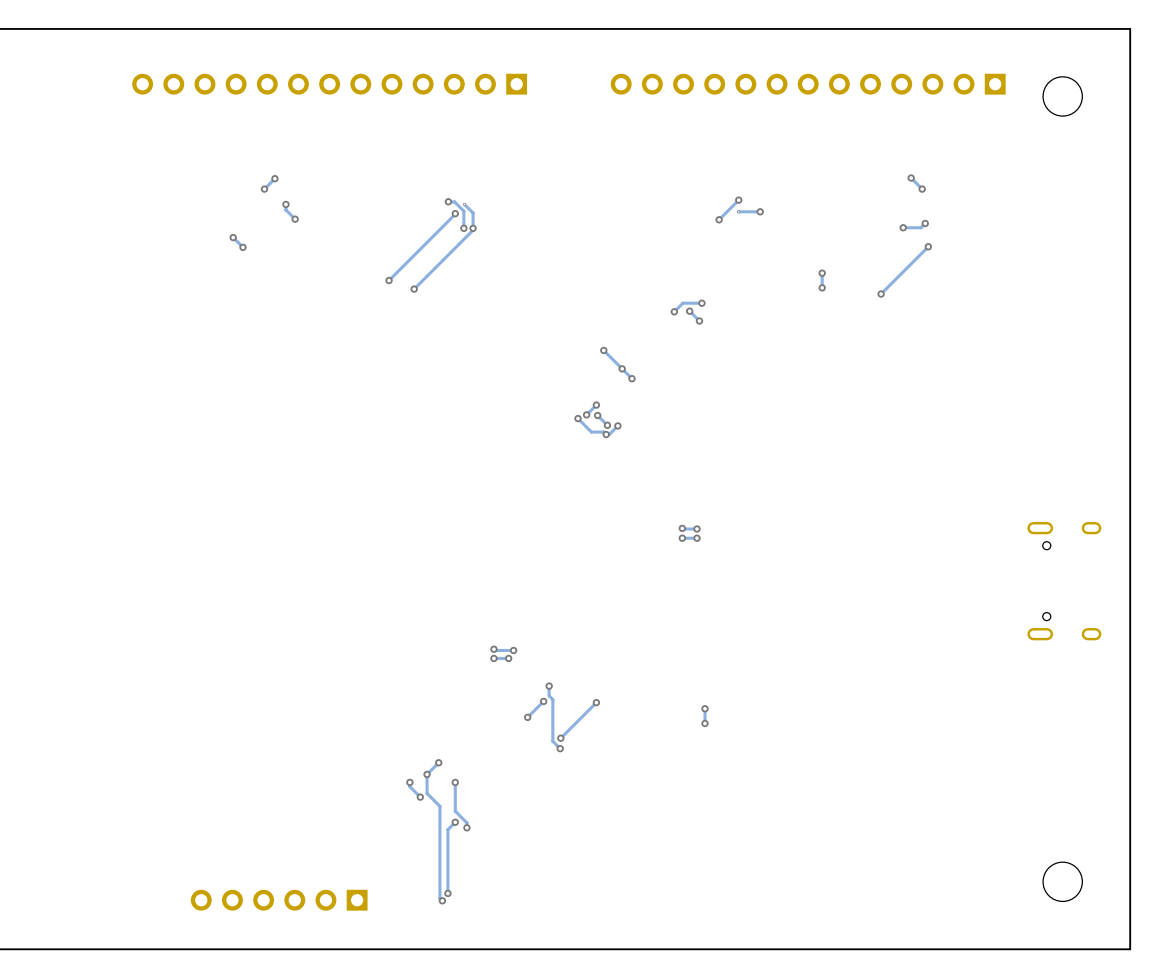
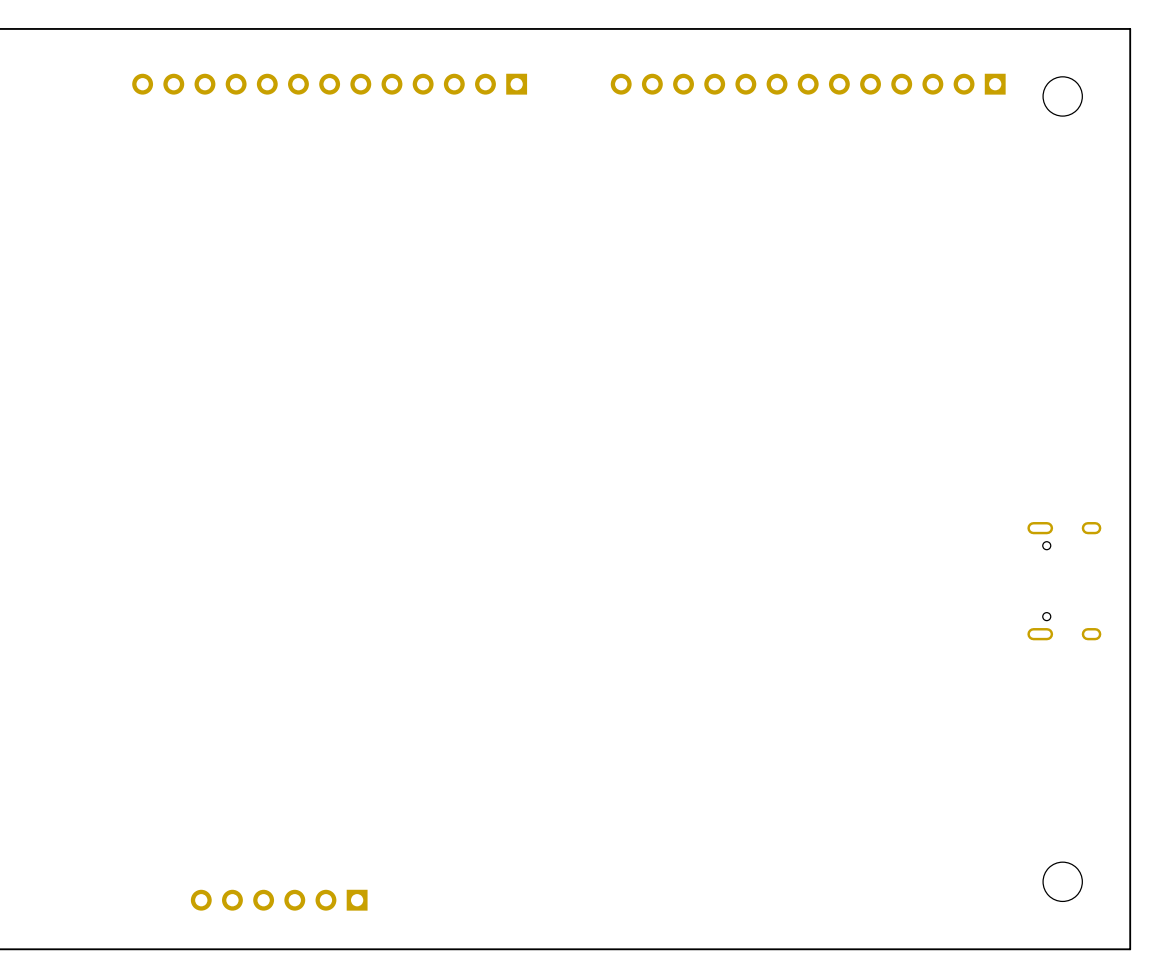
track: (274, 178) (264, 189) -> none
via: (274, 178) -> none
track: (911, 178) (922, 189) -> none
via: (911, 178) -> none
via: (264, 189) -> none
via: (922, 189) -> none
track: (738, 200) (719, 219) -> none
via: (738, 200) -> none
track: (448, 201) (454, 201) (463, 211) (463, 228) -> none
via: (448, 201) -> none
track: (285, 204) (285, 209) (295, 219) -> none
via: (285, 204) -> none
track: (464, 204) (473, 213) (473, 230) (414, 289) -> none
via: (464, 204) -> none
via: (738, 211) -> none
track: (760, 211) (738, 211) -> none
via: (760, 211) -> none
via: (455, 213) -> none
track: (455, 214) (389, 280) -> none
via: (295, 219) -> none
via: (719, 219) -> none
track: (925, 223) (920, 227) (903, 227) -> none
via: (925, 223) -> none
via: (903, 227) -> none
via: (463, 228) -> none
via: (473, 228) -> none
track: (233, 237) (243, 247) -> none
via: (233, 237) -> none
track: (928, 246) (881, 294) -> none
via: (928, 246) -> none
via: (243, 247) -> none
track: (822, 273) (822, 287) -> none
via: (822, 273) -> none
via: (389, 280) -> none
via: (822, 287) -> none
via: (414, 289) -> none
via: (881, 294) -> none
track: (701, 303) (682, 303) (674, 311) -> none
via: (701, 303) -> none
via: (674, 311) -> none
track: (689, 311) (699, 321) -> none
via: (689, 311) -> none
via: (699, 321) -> none
track: (603, 350) (631, 378) -> none
via: (603, 350) -> none
via: (622, 368) -> none
via: (631, 378) -> none
track: (596, 405) (586, 414) -> none
via: (596, 405) -> none
via: (586, 414) -> none
track: (597, 415) (607, 425) -> none
via: (597, 415) -> none
track: (578, 418) (591, 432) (603, 432) (609, 434) (617, 425) -> none
via: (578, 418) -> none
via: (607, 425) -> none
via: (617, 425) -> none
via: (606, 434) -> none
via: (682, 528) -> none
track: (697, 529) (682, 529) -> none
via: (697, 529) -> none
via: (682, 538) -> none
track: (697, 538) (682, 538) -> none
via: (697, 538) -> none
track: (493, 649) (513, 650) -> none
via: (493, 649) -> none
via: (513, 650) -> none
via: (493, 658) -> none
track: (508, 658) (493, 658) -> none
via: (508, 658) -> none
track: (549, 686) (549, 695) (552, 699) (552, 741) (560, 748) -> none
via: (549, 686) -> none
track: (543, 701) (527, 717) -> none
via: (543, 701) -> none
track: (596, 702) (560, 738) -> none
via: (596, 702) -> none
track: (705, 708) (705, 723) -> none
via: (705, 708) -> none
via: (527, 717) -> none
via: (705, 723) -> none
via: (560, 738) -> none
via: (560, 748) -> none
track: (438, 762) (427, 774) (427, 793) (439, 806) (439, 898) (442, 900) -> none
via: (438, 762) -> none
via: (427, 774) -> none
track: (409, 782) (409, 786) (420, 797) -> none
via: (409, 782) -> none
track: (455, 782) (455, 811) (466, 822) (466, 827) -> none
via: (455, 782) -> none
via: (420, 797) -> none
track: (455, 822) (447, 829) (447, 893) -> none
via: (455, 822) -> none
via: (466, 827) -> none
via: (447, 893) -> none
via: (442, 900) -> none

